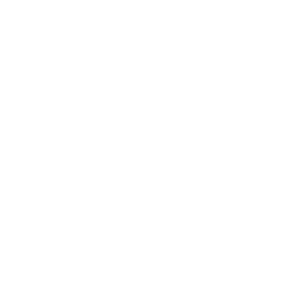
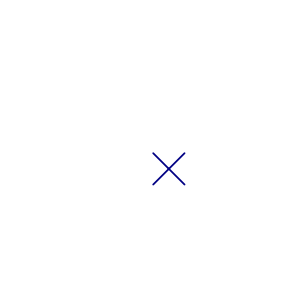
no-connect mark: none -> (168, 168)

